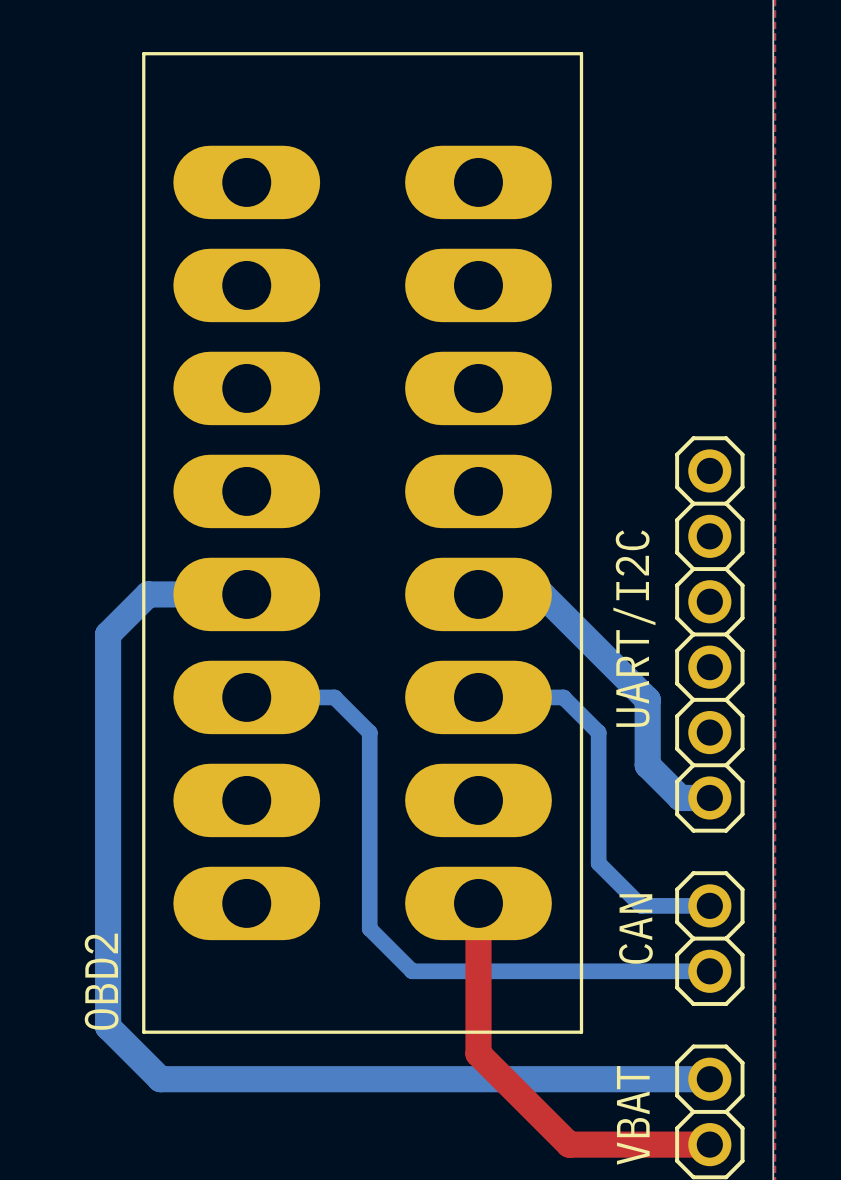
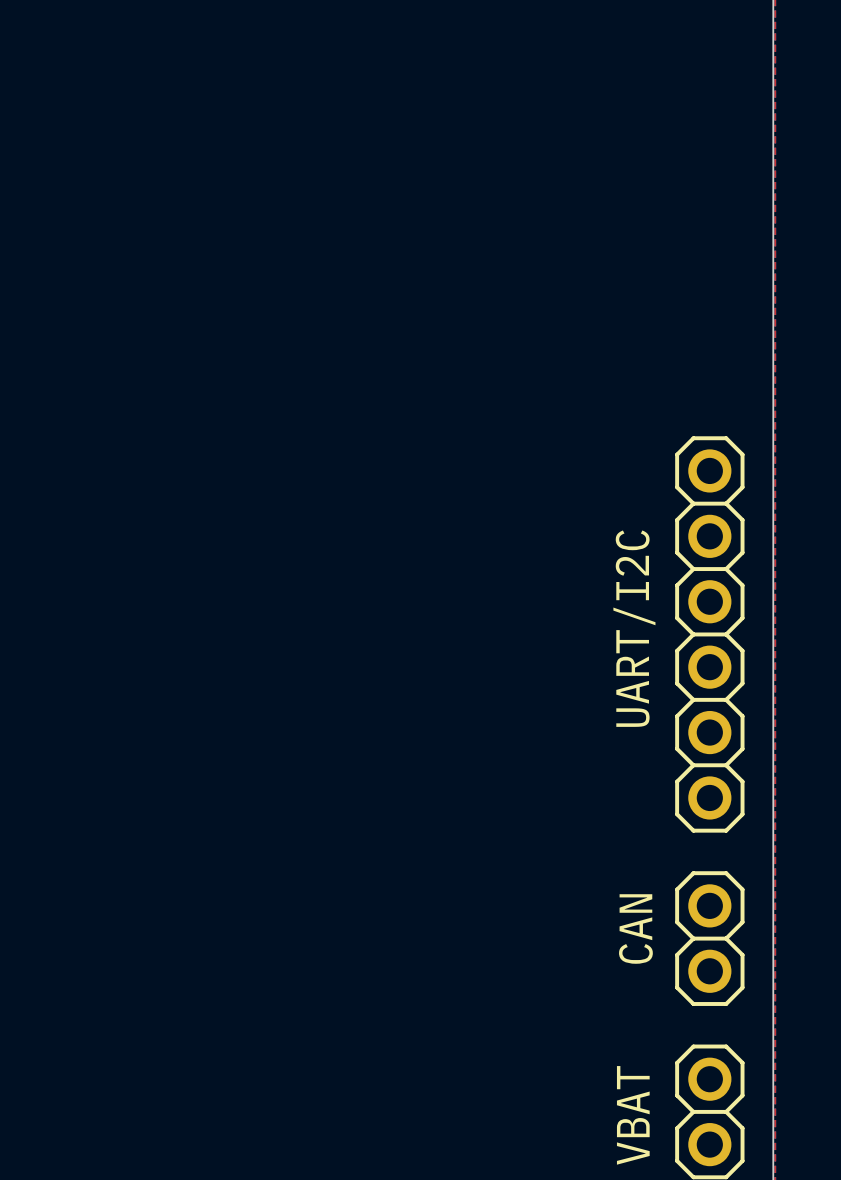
OBD2: (362, 542) -> none
bottom track: (246, 594) (148, 594) (108, 634) (108, 1026) (160, 1079) (709, 1079) -> none
bottom track: (478, 594) (542, 594) (647, 699) (647, 765) (680, 797) (709, 797) -> none
bottom track: (246, 697) (334, 697) (369, 732) (369, 928) (412, 971) (709, 971) -> none
bottom track: (478, 697) (563, 697) (598, 732) (598, 863) (641, 905) (709, 905) -> none
top track: (478, 903) (478, 1053) (569, 1144) (709, 1144) -> none

